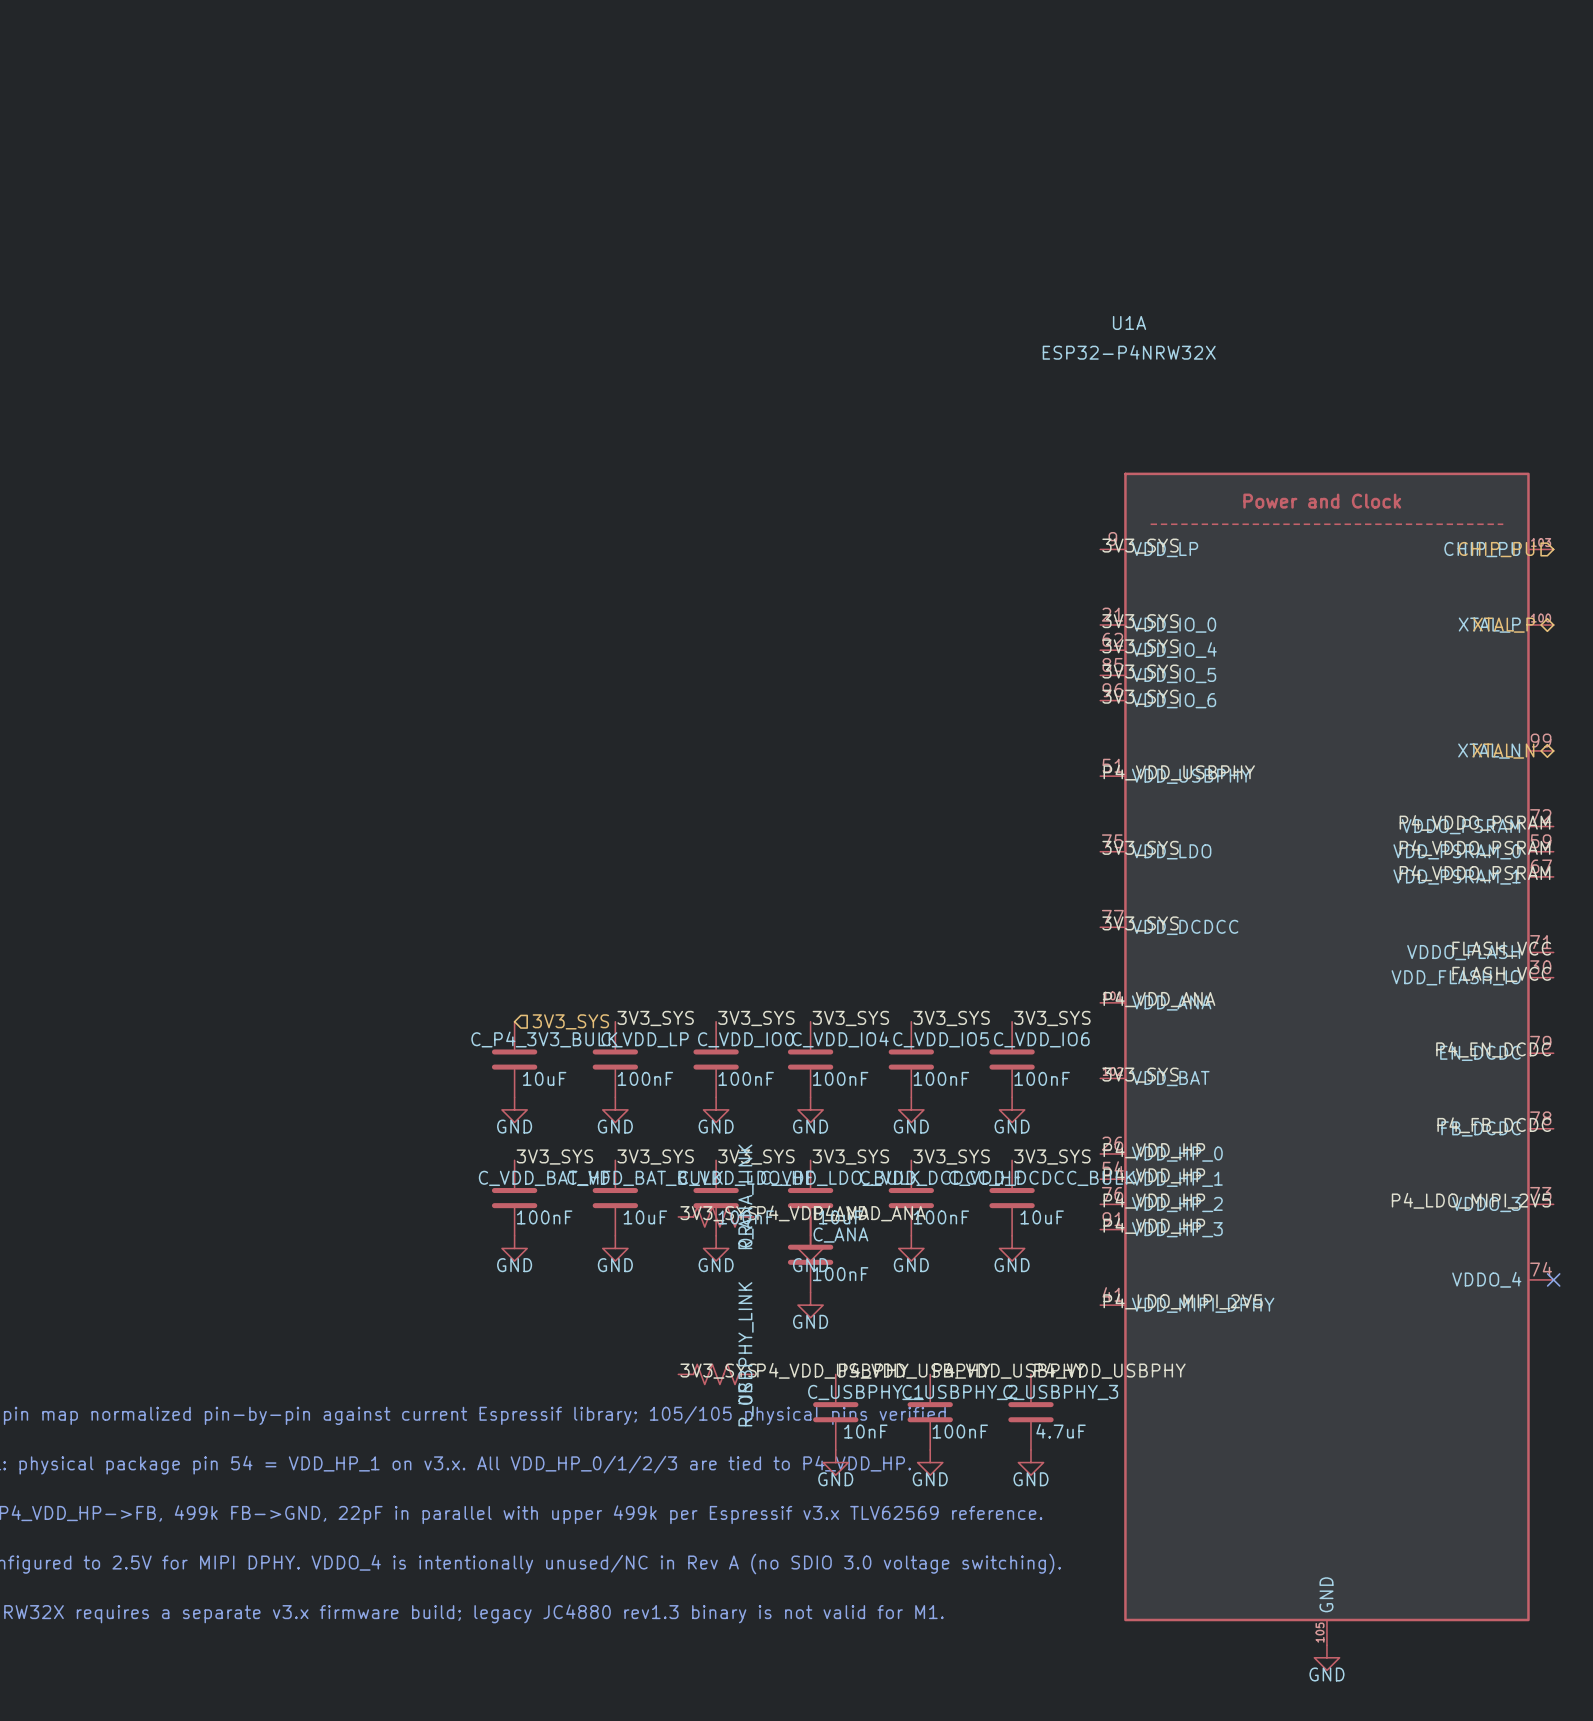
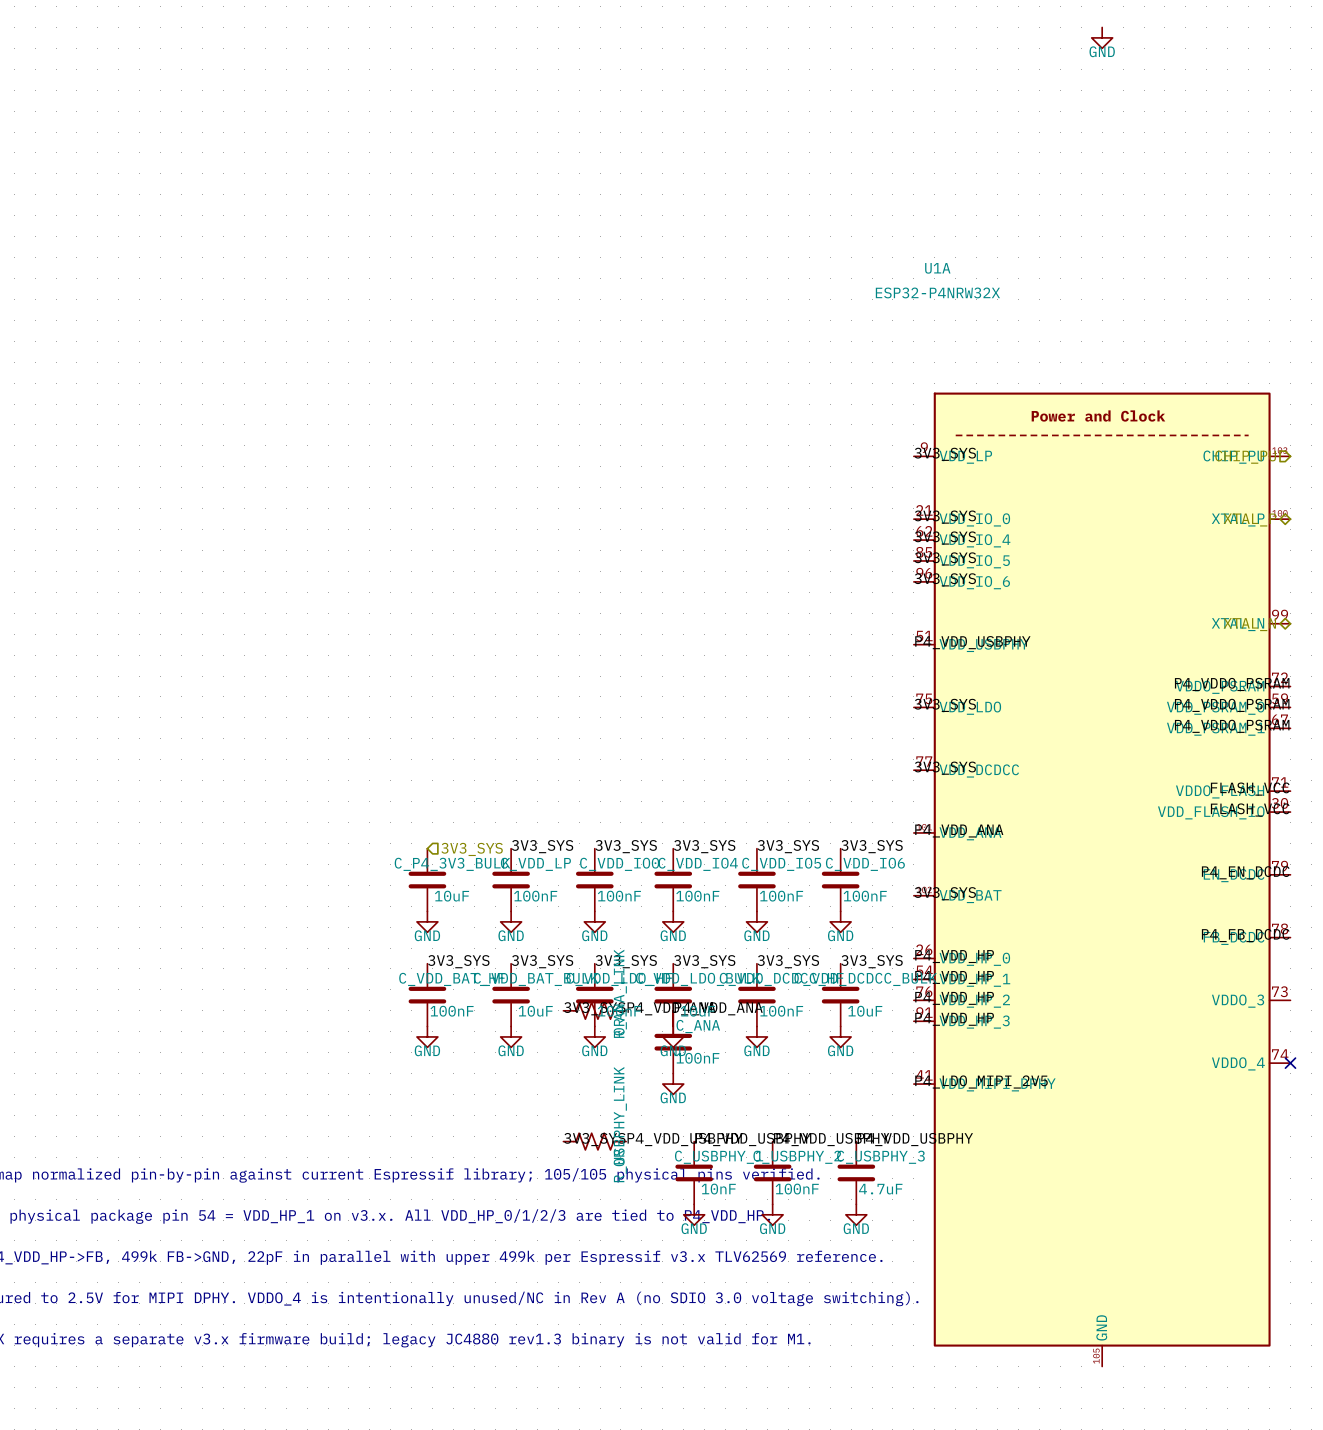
power symbol: none -> GND (1102, 37)
label: P4_LDO_MIPI_2V5 (1471, 1200) -> none
power symbol: GND (1326, 1657) -> none

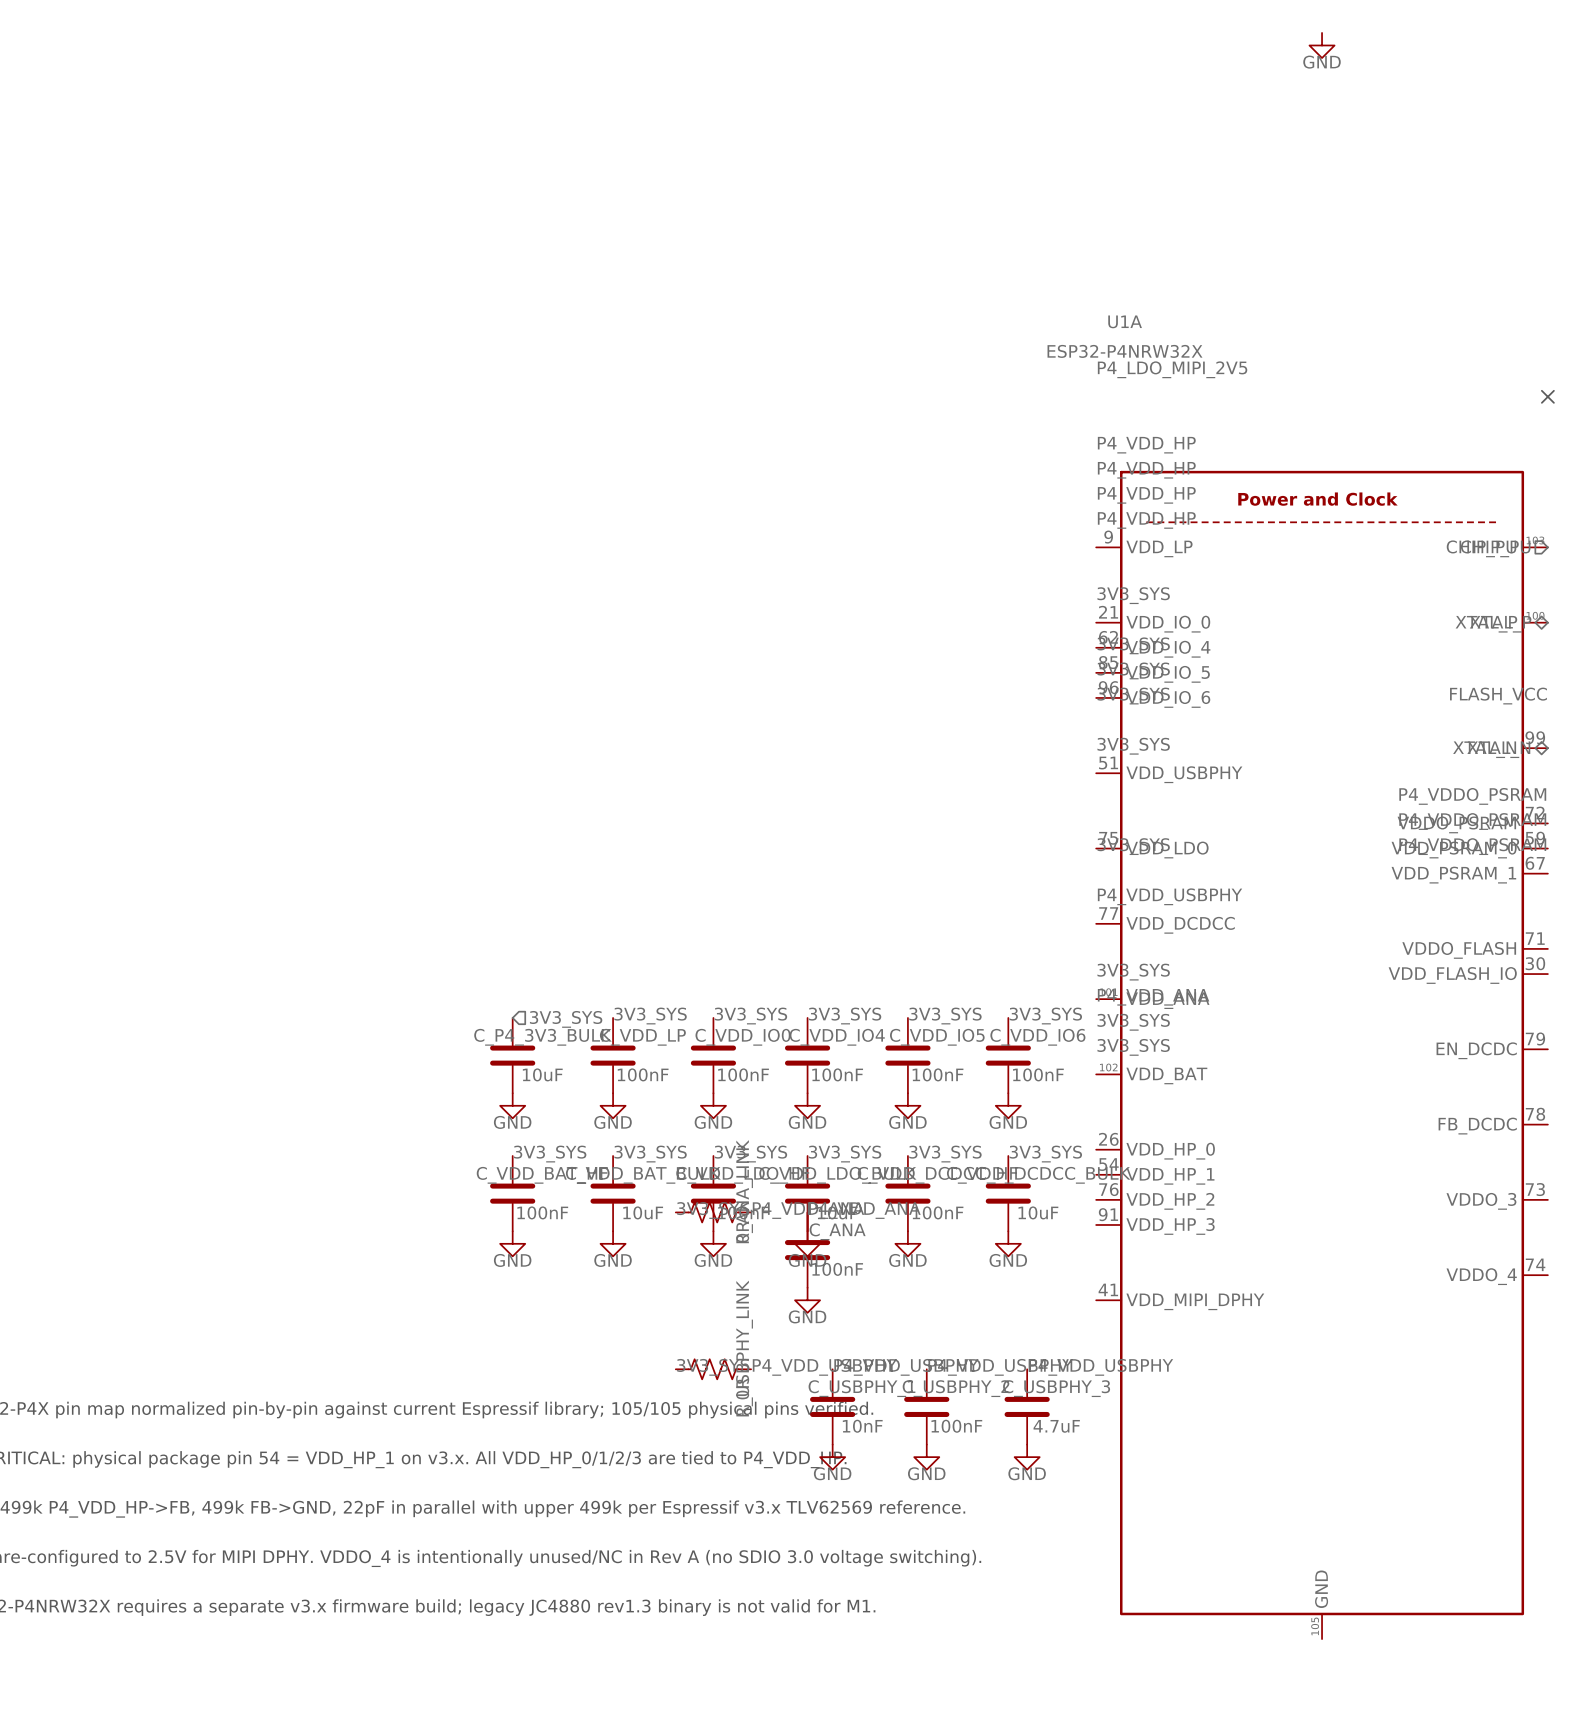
label: none -> P4_LDO_MIPI_2V5 (1172, 369)
no-connect mark: none -> (1547, 396)
label: none -> P4_VDD_HP (1146, 445)
label: none -> P4_VDD_HP (1146, 470)
label: none -> P4_VDD_HP (1146, 495)
label: none -> P4_VDD_HP (1146, 520)
label: 3V3_SYS (945, 454) -> none
label position: 3V3_SYS (945, 517) -> 3V3_SYS (1133, 595)
label: none -> FLASH_VCC (1498, 696)
label: none -> 3V3_SYS (1133, 746)
label position: P4_VDD_USBPHY (972, 642) -> P4_VDD_USBPHY (1170, 896)
label position: P4_VDDO_PSRAM (1232, 726) -> P4_VDDO_PSRAM (1472, 796)
label: 3V3_SYS (945, 768) -> none
label: FLASH_VCC (1250, 789) -> none
label: none -> 3V3_SYS (1133, 972)
label: FLASH_VCC (1250, 810) -> none
label: none -> 3V3_SYS (1133, 1022)
label: P4_EN_DCDC (1245, 872) -> none
label position: 3V3_SYS (945, 893) -> 3V3_SYS (1133, 1047)
label: P4_FB_DCDC (1245, 935) -> none
label: P4_VDD_HP (954, 956) -> none
label: P4_VDD_HP (954, 977) -> none
label: P4_VDD_HP (954, 998) -> none
label: P4_VDD_HP (954, 1019) -> none
no-connect mark: (1290, 1063) -> none
label: P4_LDO_MIPI_2V5 (981, 1082) -> none

